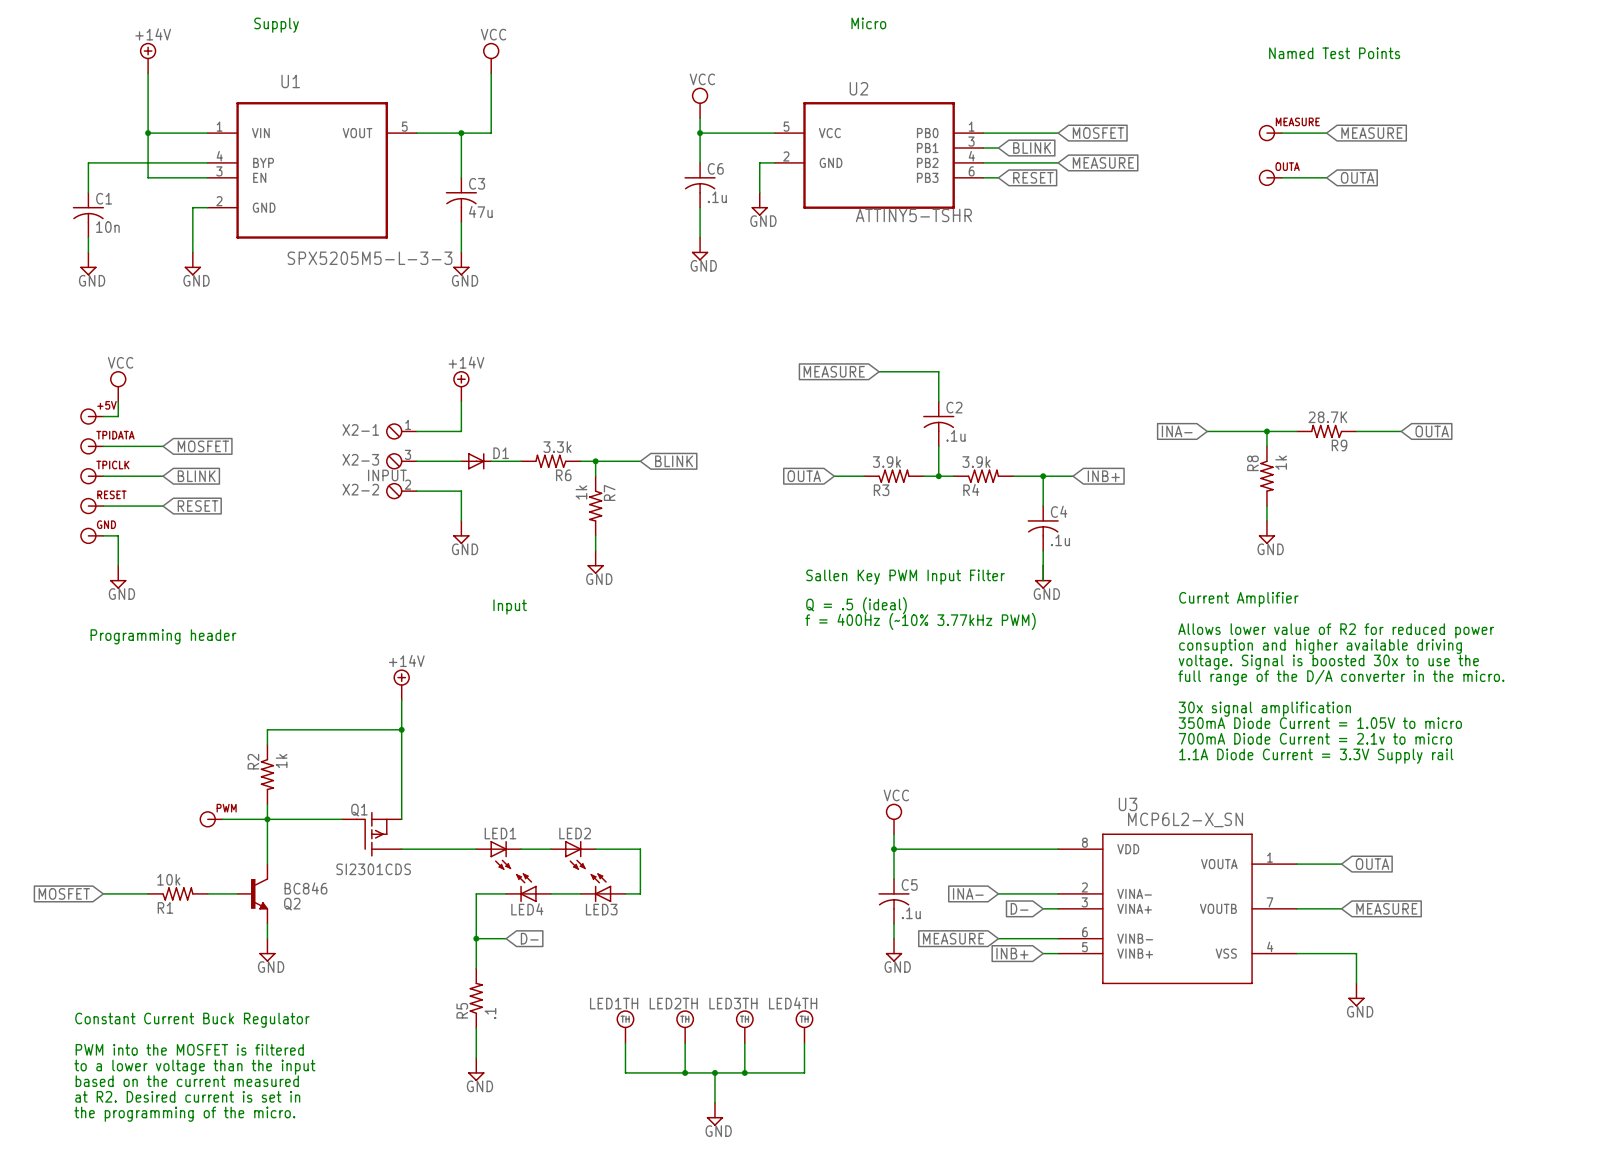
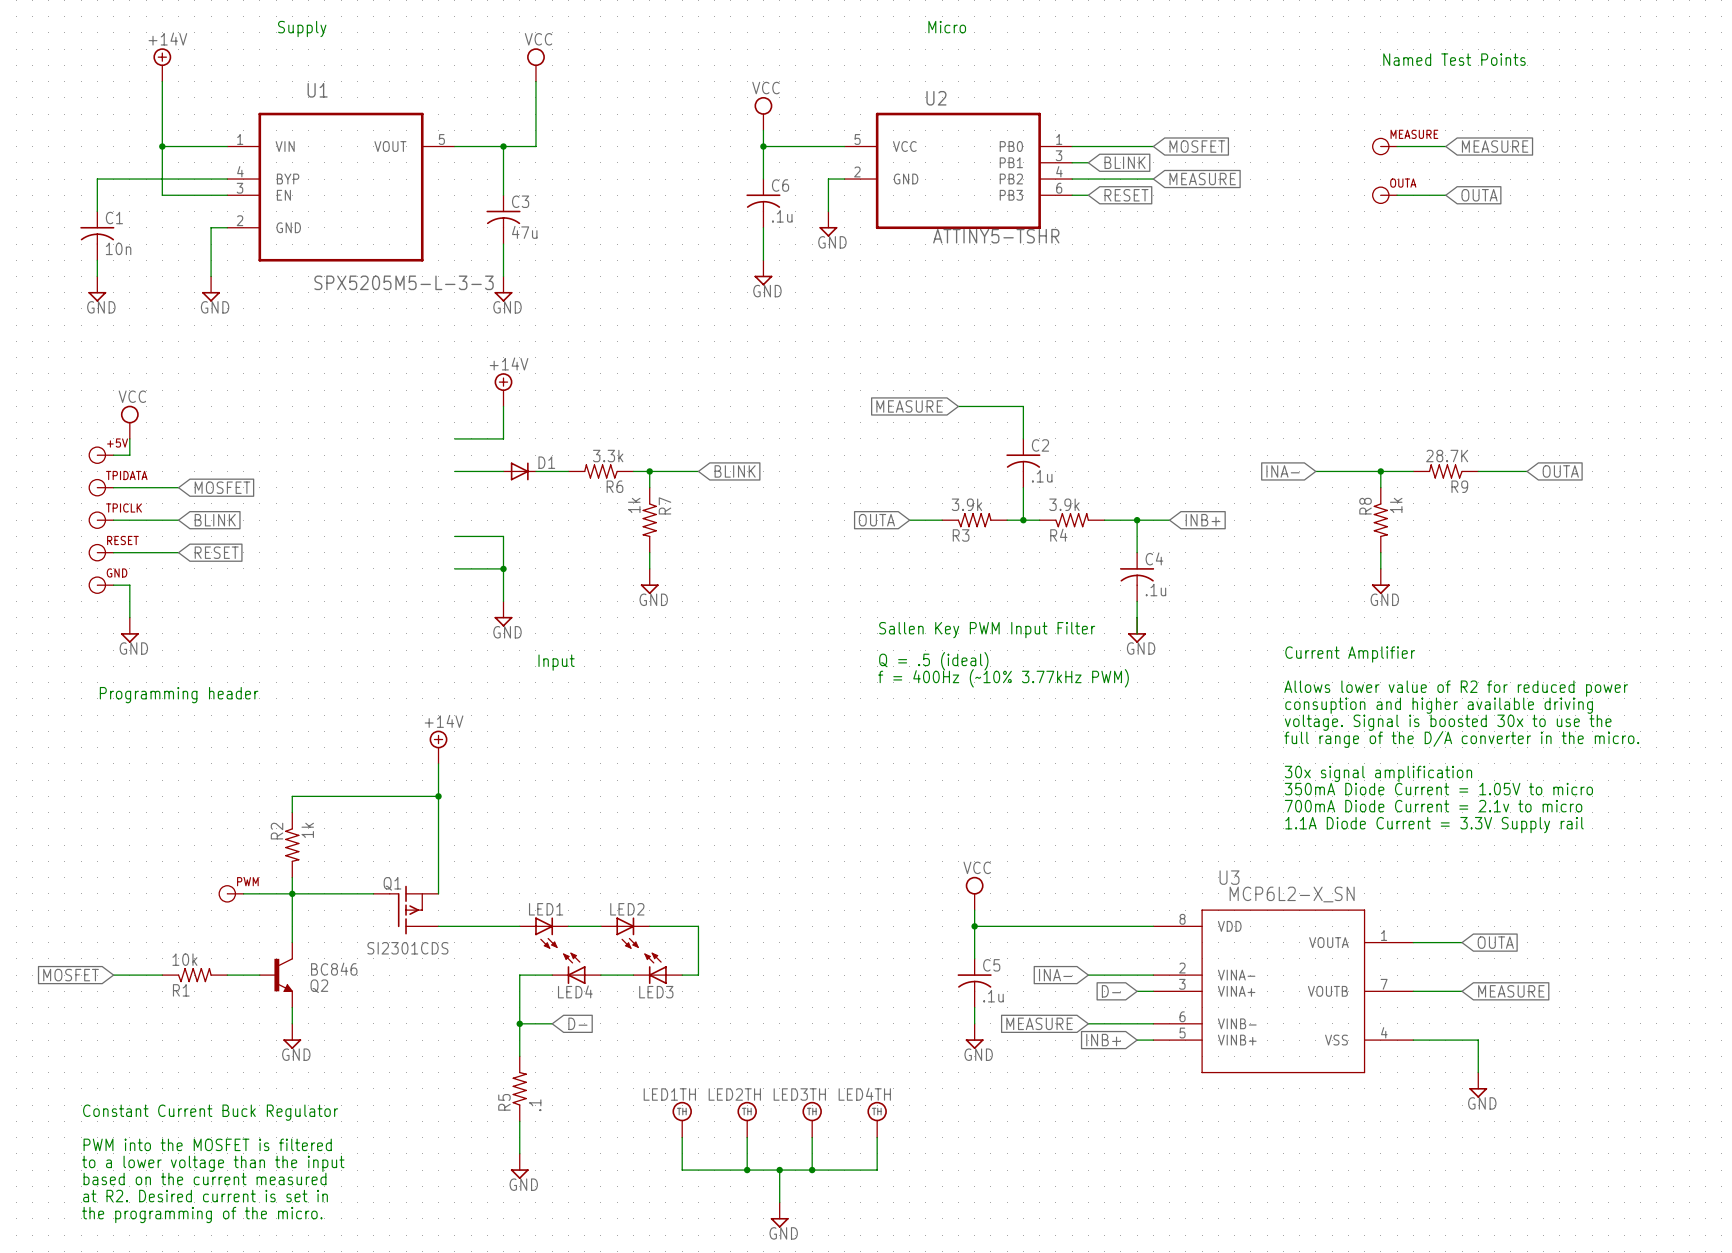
wire: none -> (503, 406) (503, 438) (454, 438)
power symbol position: +14V (461, 386) -> +14V (503, 389)
wire: (461, 401) (461, 431) -> none
X2-1: (401, 431) -> none
X2-3: INPUT (401, 461) -> none
wire: (416, 461) (461, 461) -> none
D1 position: (476, 461) -> (519, 471)
wire: (491, 461) (521, 461) -> (535, 471) (568, 471)
R6 position: (550, 461) -> (600, 471)
wire: (580, 461) (640, 461) -> (633, 471) (698, 471)
wire: (595, 461) (595, 476) -> (649, 471) (649, 487)
junction position: (595, 461) -> (649, 471)
global label position: BLINK (674, 461) -> BLINK (735, 471)
X2-2: (401, 491) -> none
R7 position: (595, 506) -> (649, 520)
wire: none -> (454, 568) (503, 568) (503, 601)
junction: none -> (503, 568)
power symbol position: GND (461, 532) -> GND (503, 614)
power symbol position: GND (595, 562) -> GND (649, 581)

